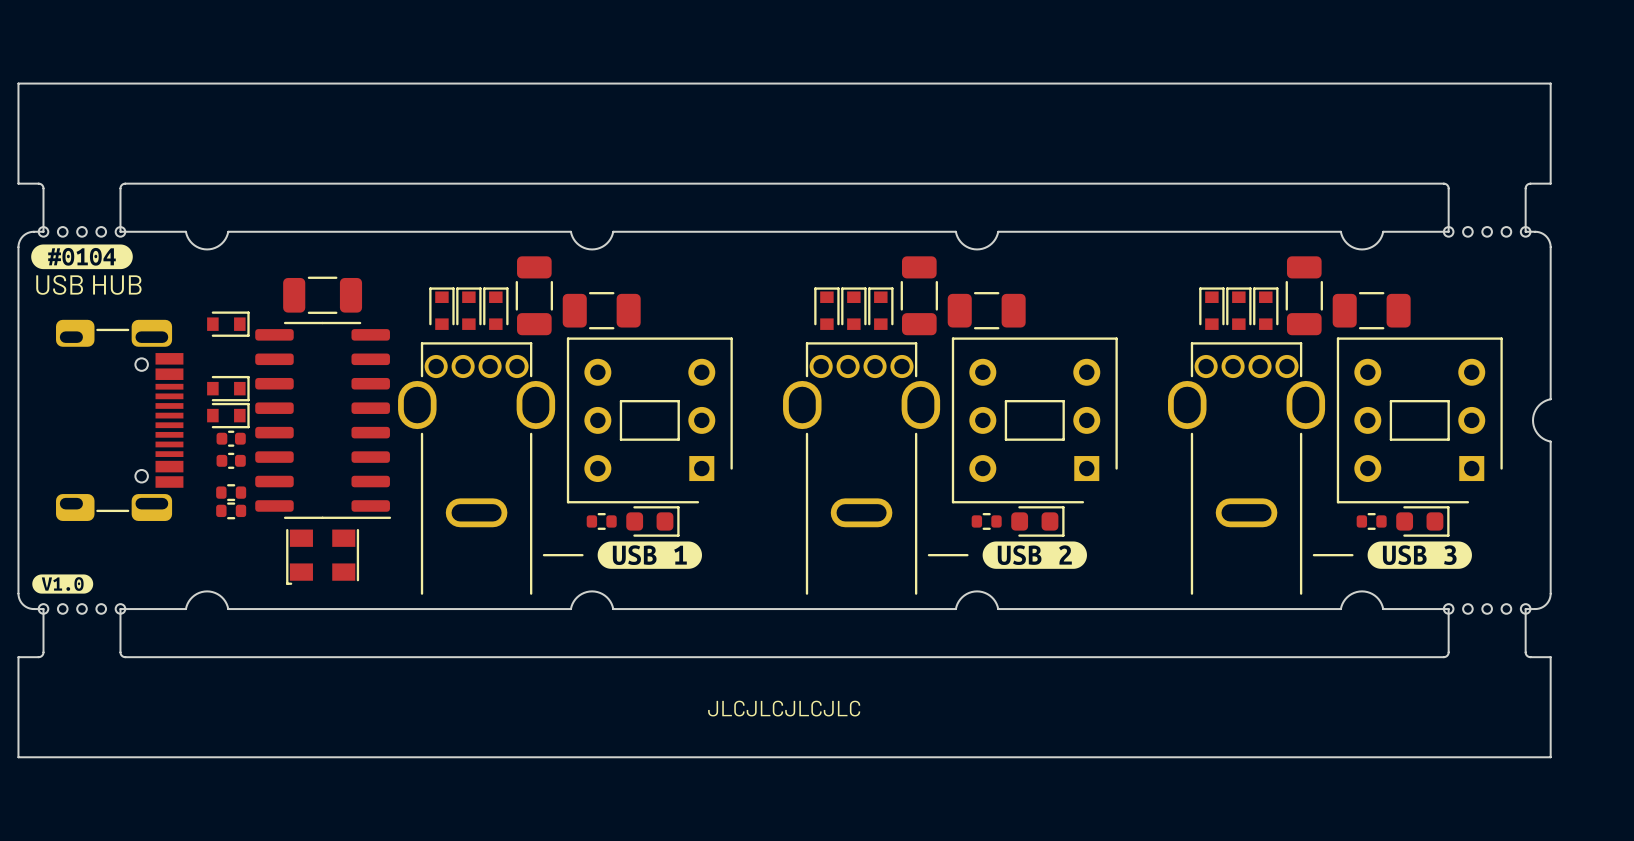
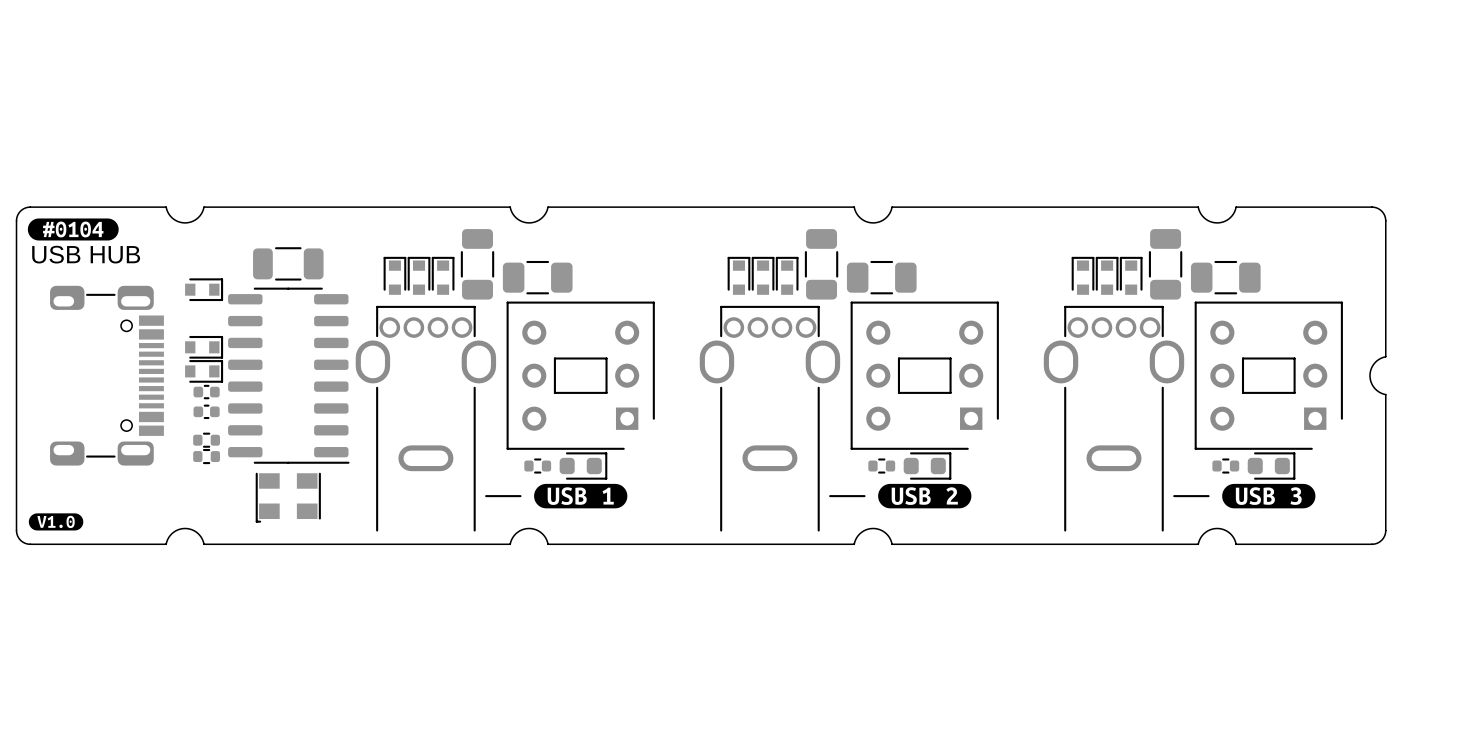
board edge: (43, 231) (43, 186) (39, 183) (18, 183) (18, 83) (1550, 83) (1550, 183) (1529, 183) (1526, 186) (1525, 231) -> (38, 207) (107, 207)
part: (81, 231) -> none
board edge: (120, 231) (120, 187) (125, 183) (1443, 183) (1448, 187) (1448, 231) -> (1363, 207) (1294, 207)
part: (1487, 231) -> none
part: (81, 608) -> none
part: (1487, 608) -> none
board edge: (43, 609) (43, 654) (39, 657) (18, 657) (18, 757) (1550, 757) (1550, 657) (1529, 657) (1526, 654) (1525, 609) -> (38, 544) (107, 544)
board edge: (120, 609) (120, 652) (125, 657) (1443, 657) (1448, 652) (1448, 609) -> (1363, 544) (1294, 544)
text: JLCJLCJLCJLC (784, 708) -> none

